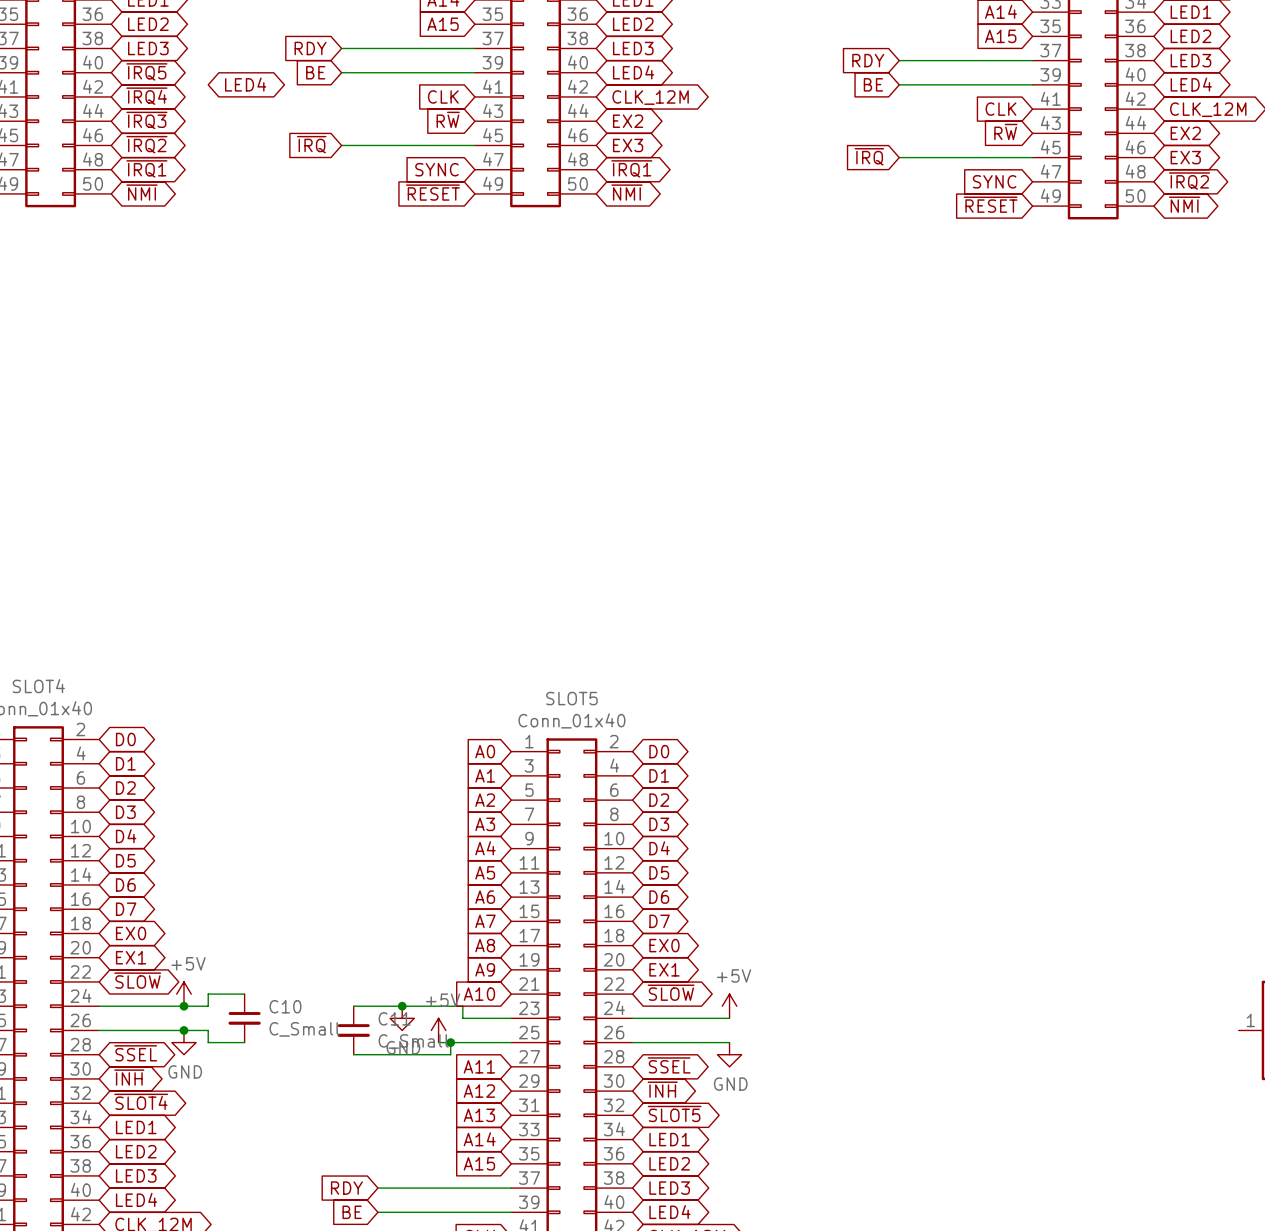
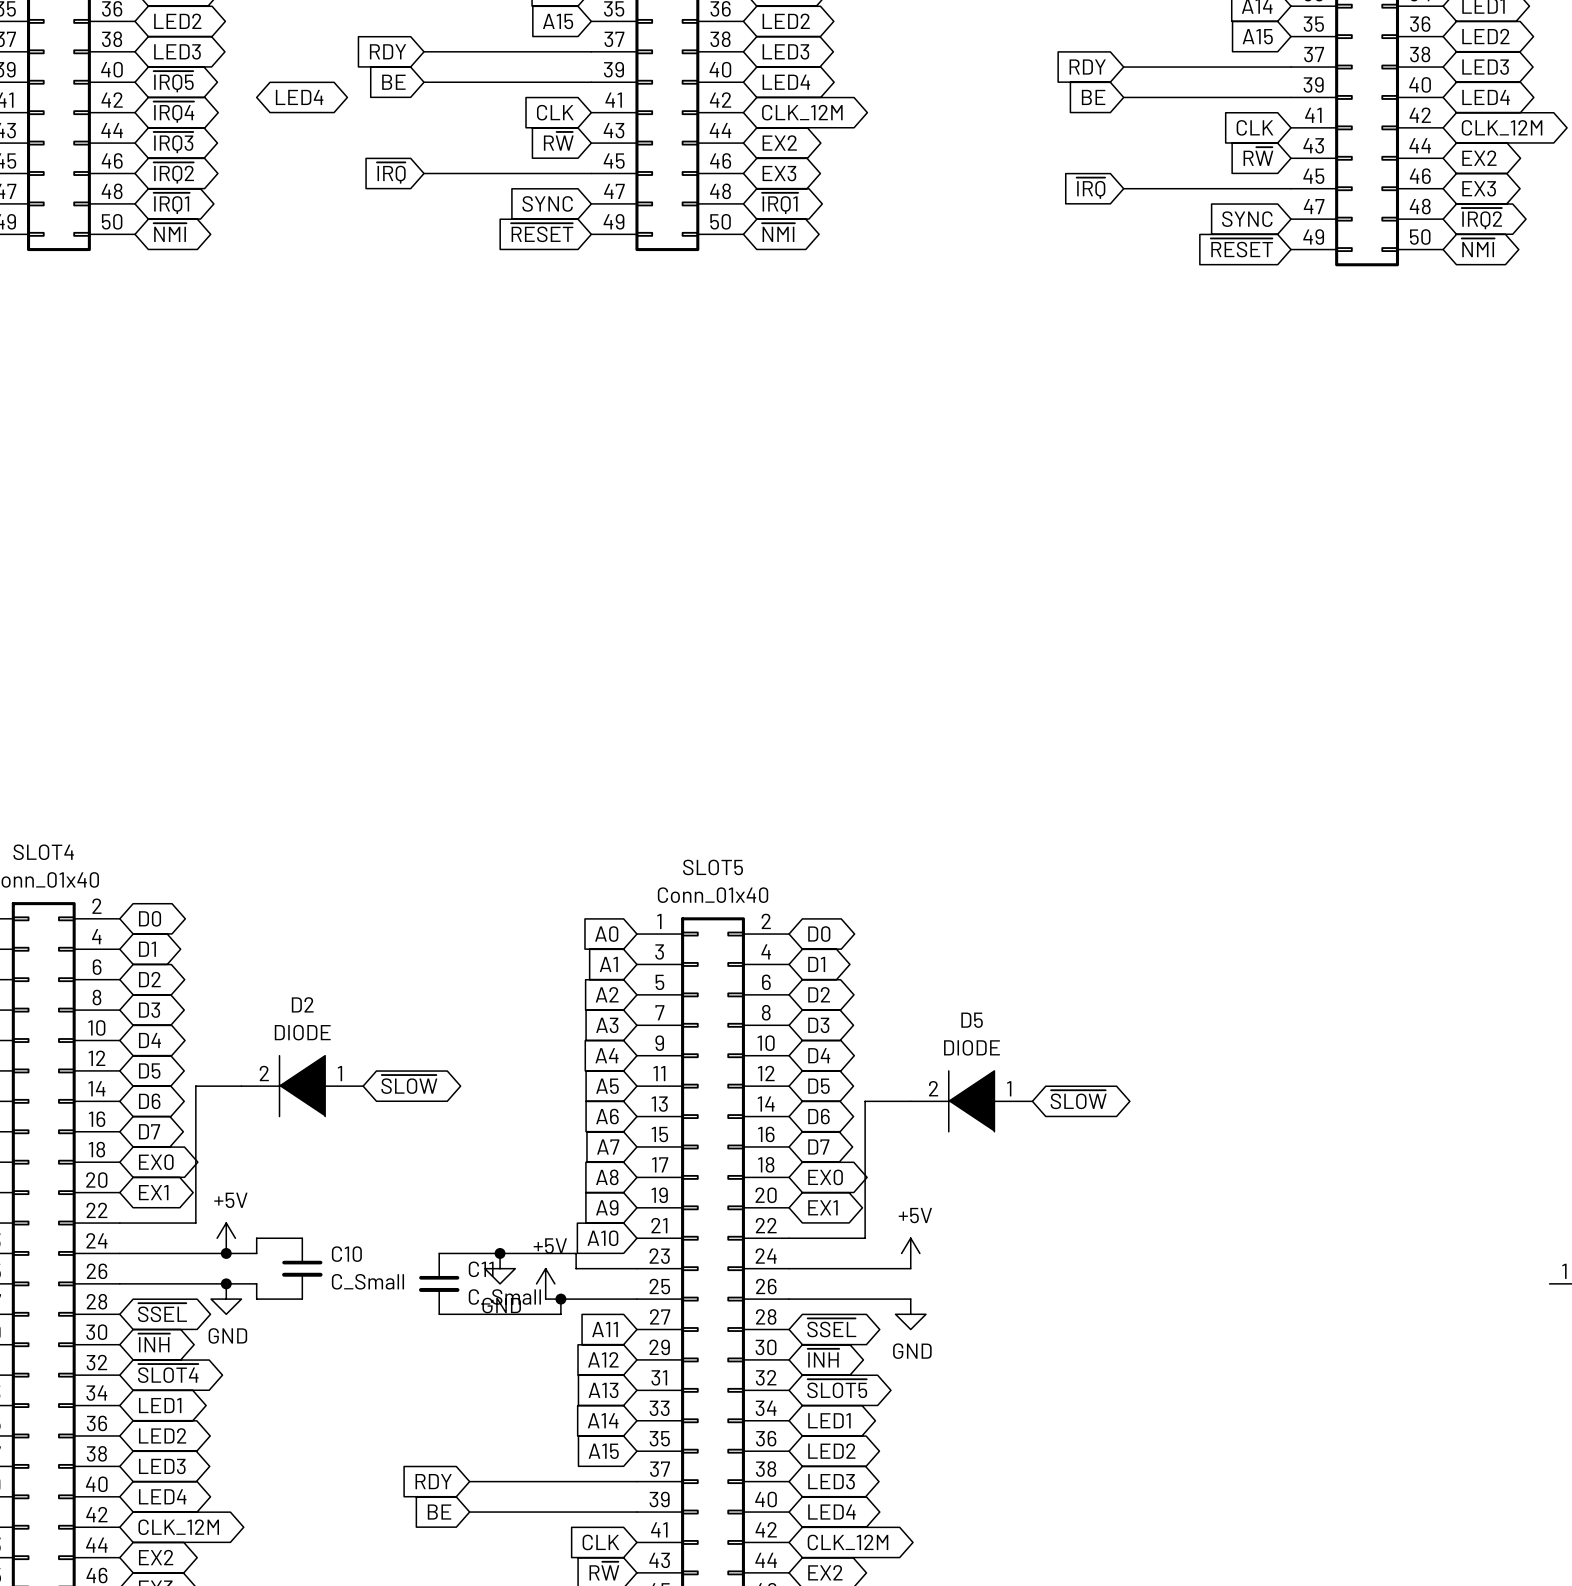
global label: none -> ~{SLOW} (409, 1084)
wire: none -> (241, 1086) (195, 1086) (195, 1223) (119, 1223)
D2: none -> DIODE (302, 1086)
global label: none -> ~{SLOW} (1078, 1099)
wire: none -> (910, 1101) (865, 1101) (865, 1238) (789, 1238)
D5: none -> DIODE (971, 1101)
global label: ~{SLOW} (137, 980) -> none
global label: ~{SLOW} (671, 992) -> none

